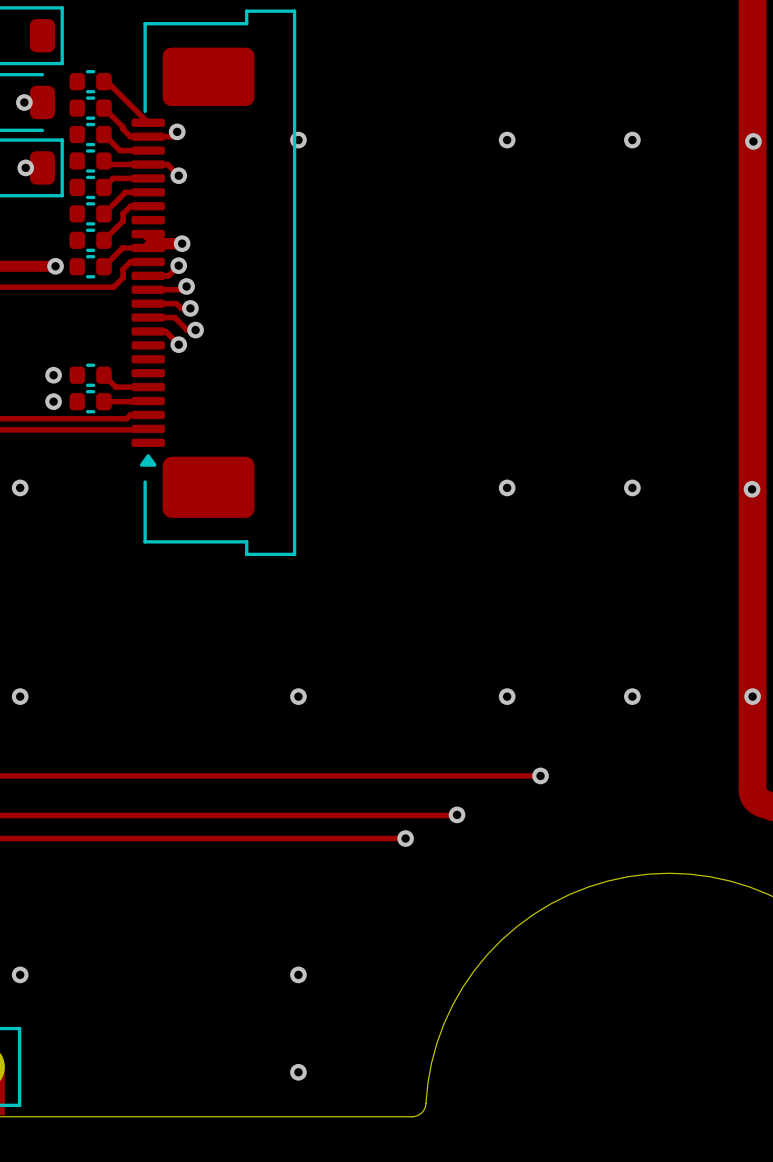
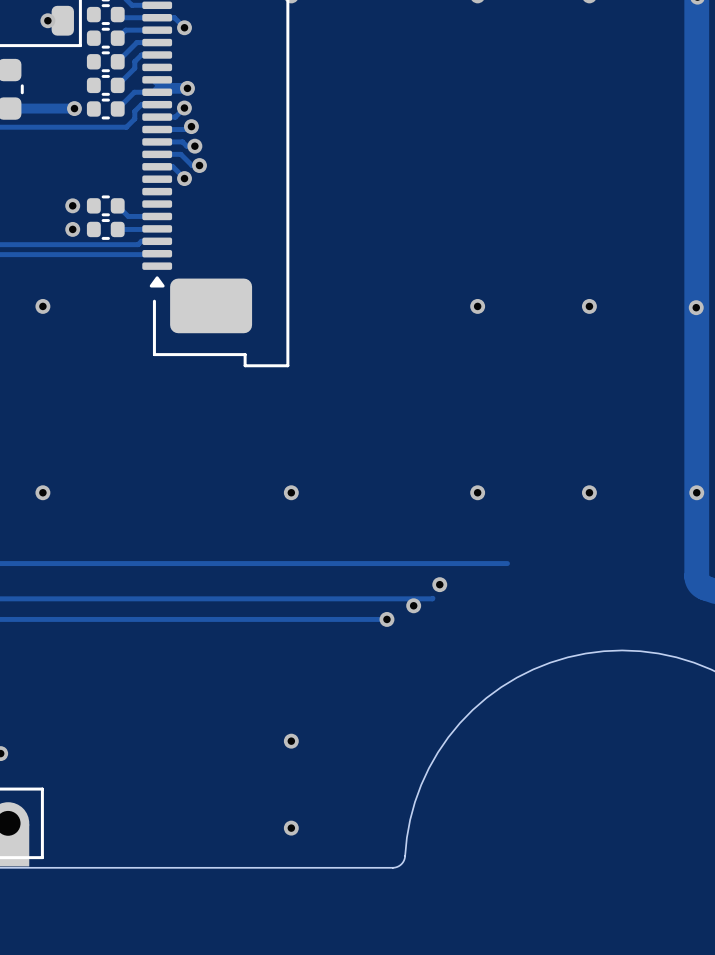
via: (540, 775) -> none
via position: (457, 814) -> (439, 584)
via: none -> (413, 605)
via: (20, 974) -> none

